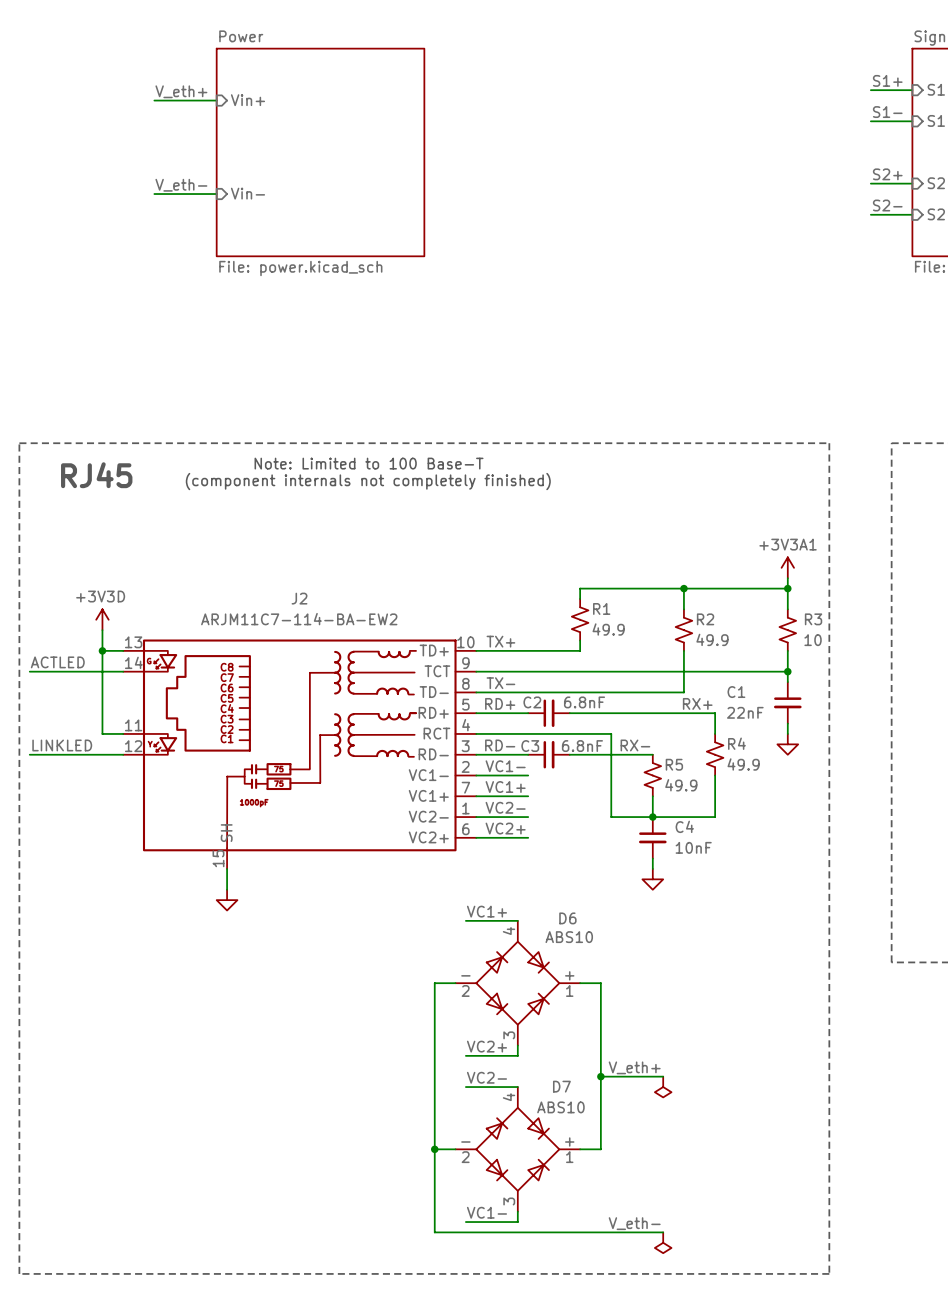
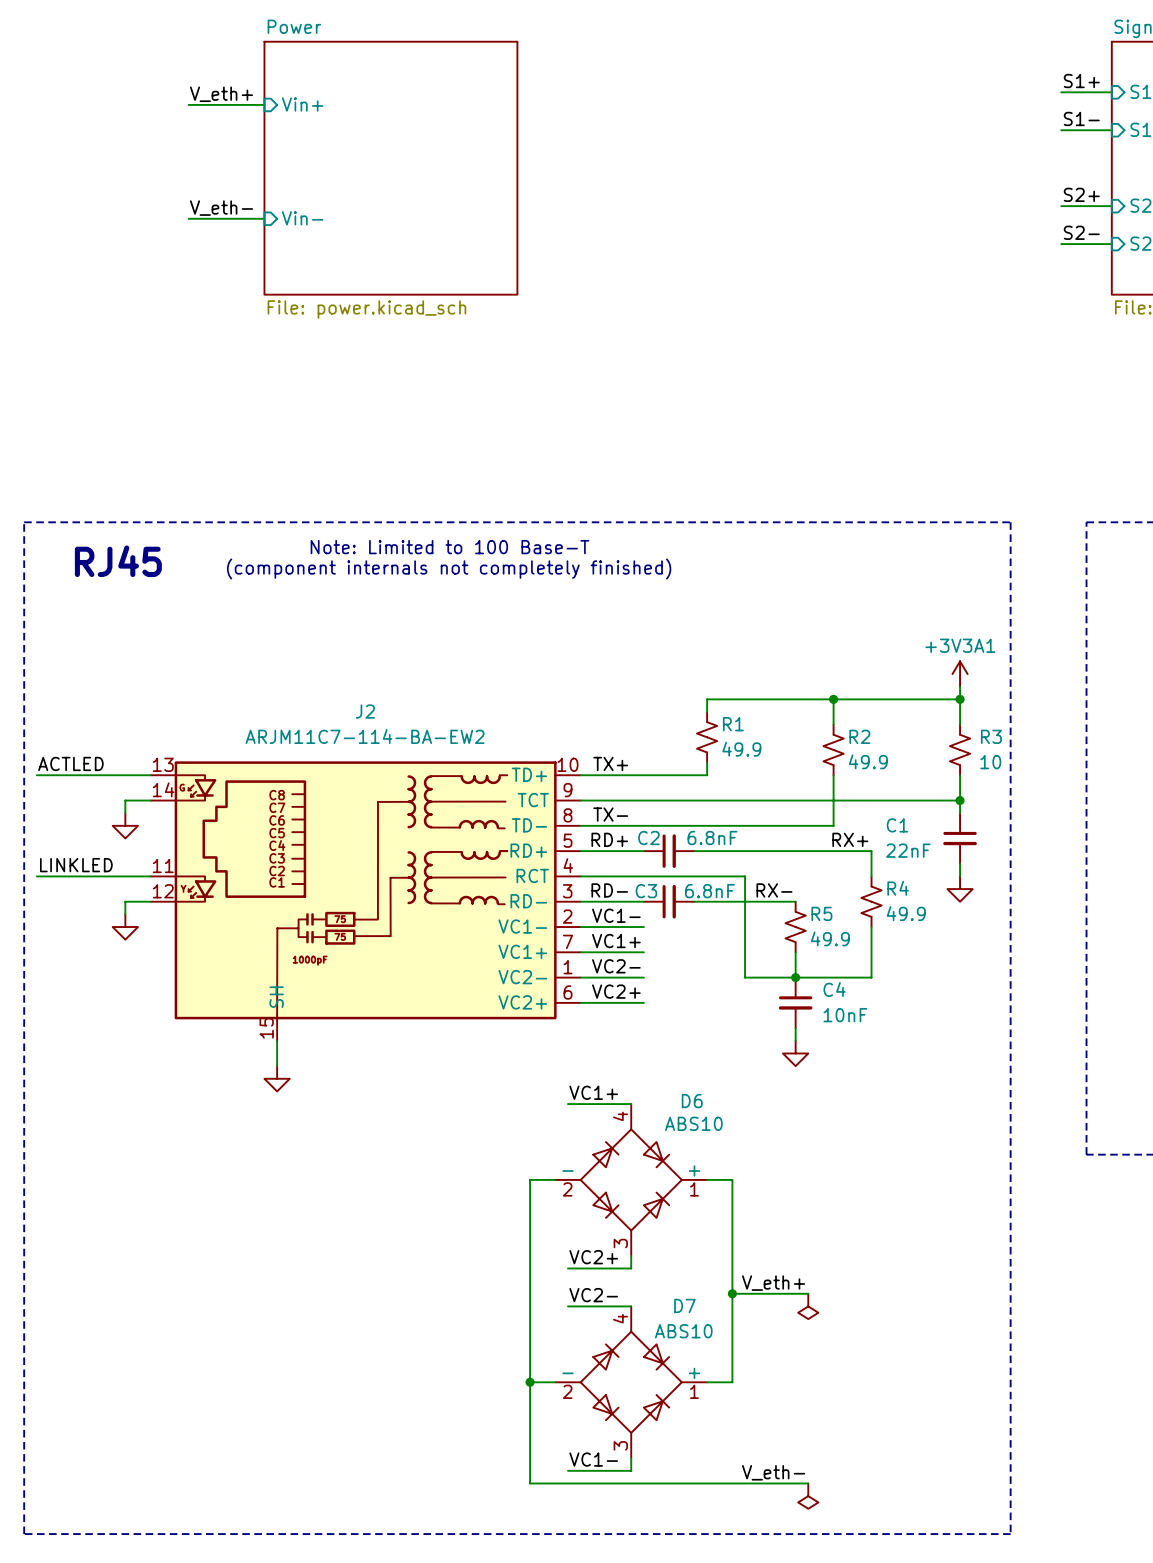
power symbol: +3V3D (102, 619) -> none
wire: (102, 630) (102, 671) (29, 671) -> none
wire: none -> (36, 775) (125, 775)
junction: (102, 650) -> none
label position: ACTLED (57, 662) -> ACTLED (70, 763)
wire: (102, 682) (102, 733) -> (36, 876) (125, 876)
power symbol: none -> (125, 825)
label position: LINKLED (62, 745) -> LINKLED (76, 865)
wire: (29, 754) (102, 754) -> (125, 914) (125, 901)
power symbol: none -> (125, 927)

